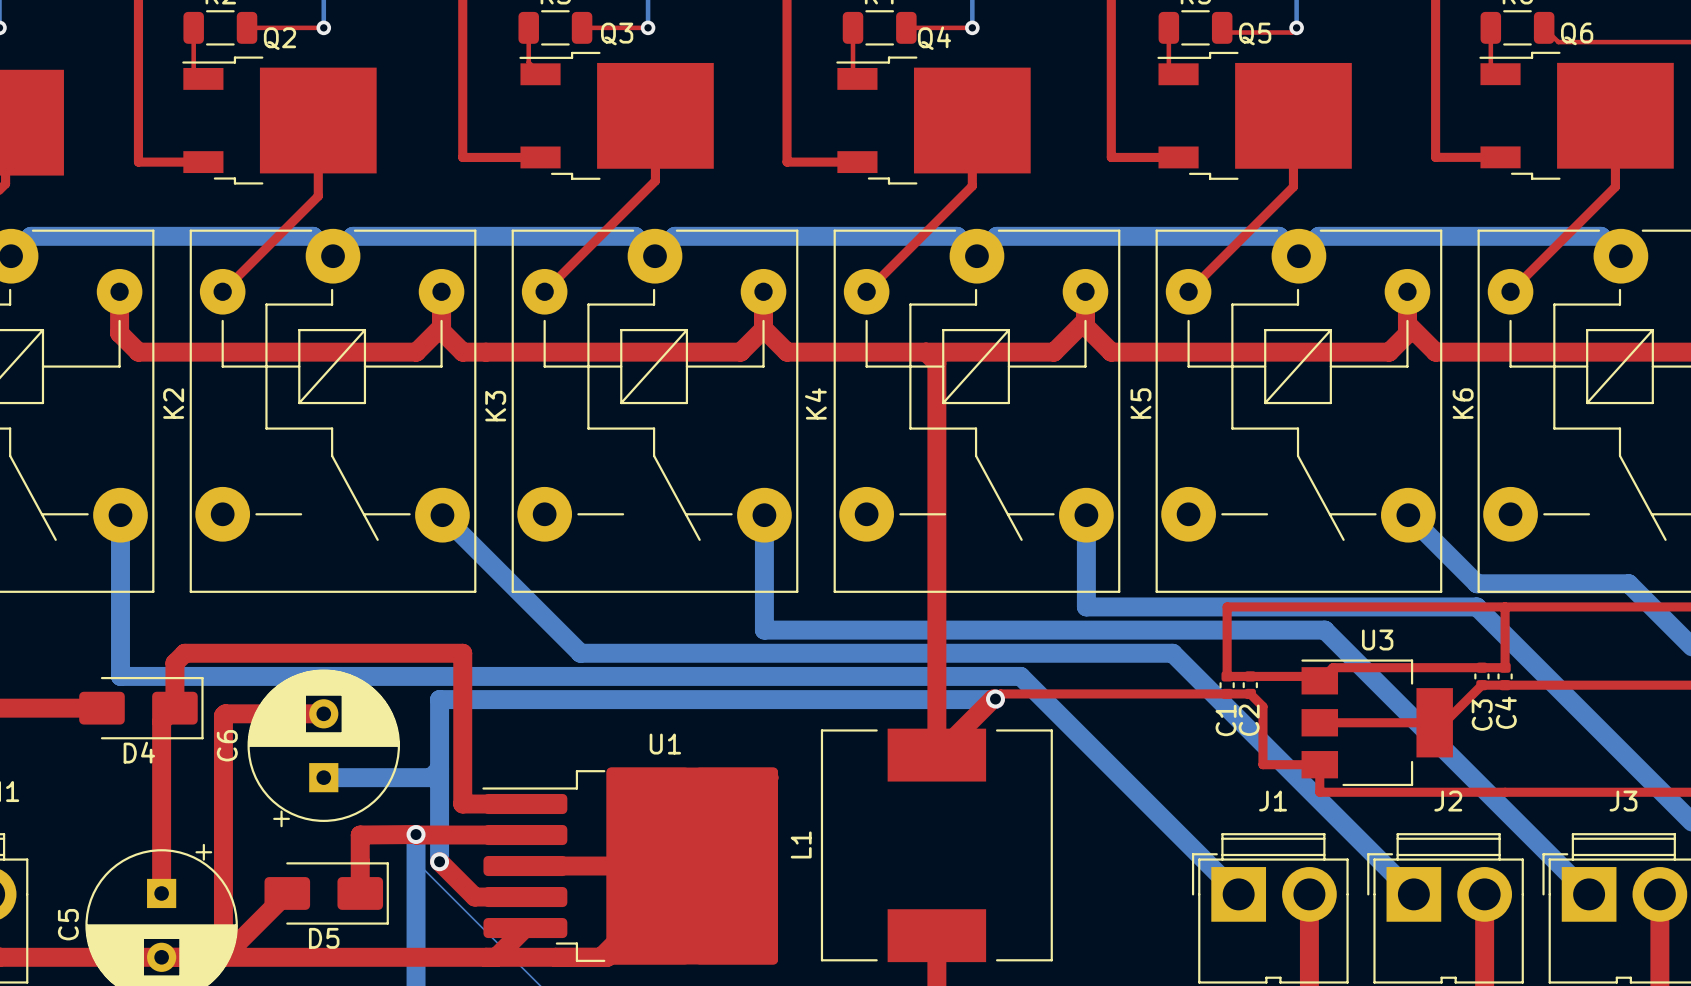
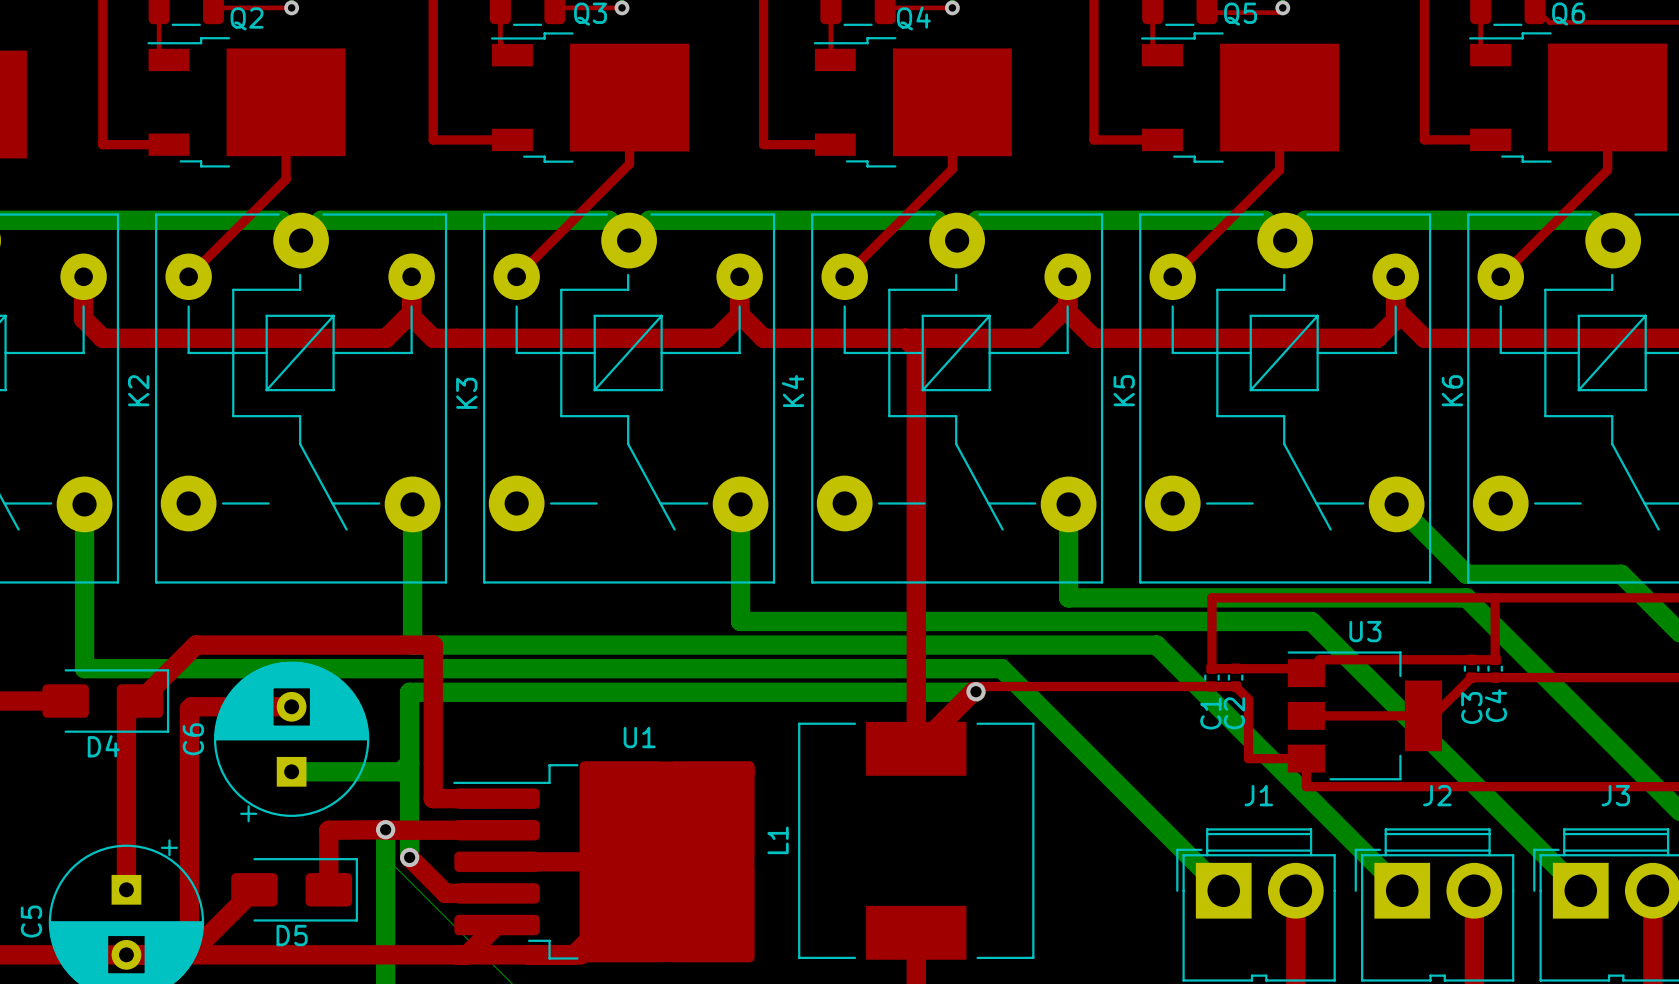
bottom track: (442, 515) (580, 653) -> (412, 504) (412, 645) (553, 645)
top track: (229, 653) (184, 653) (174, 663) (174, 708) -> (195, 645) (140, 701)

